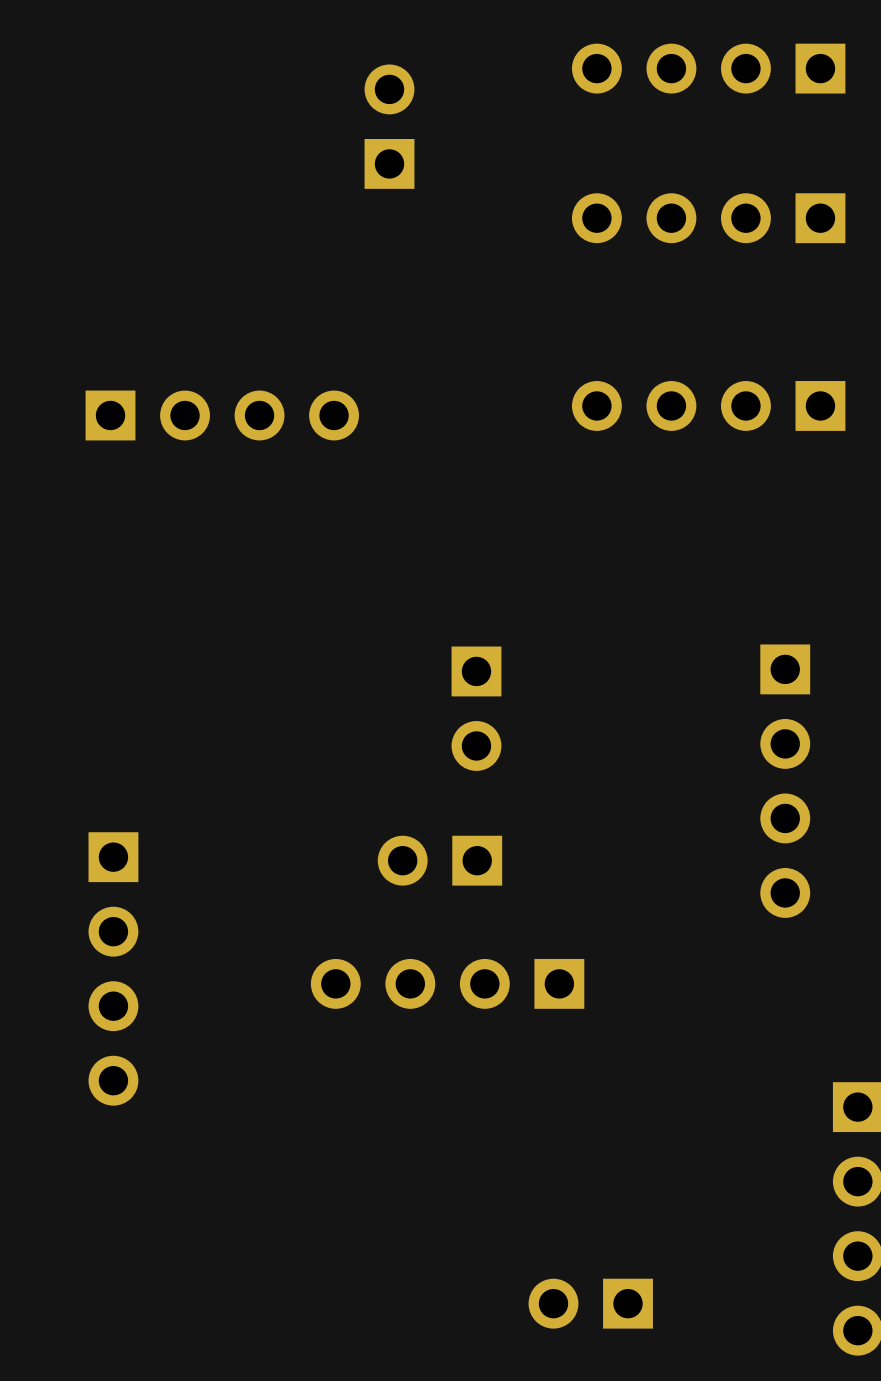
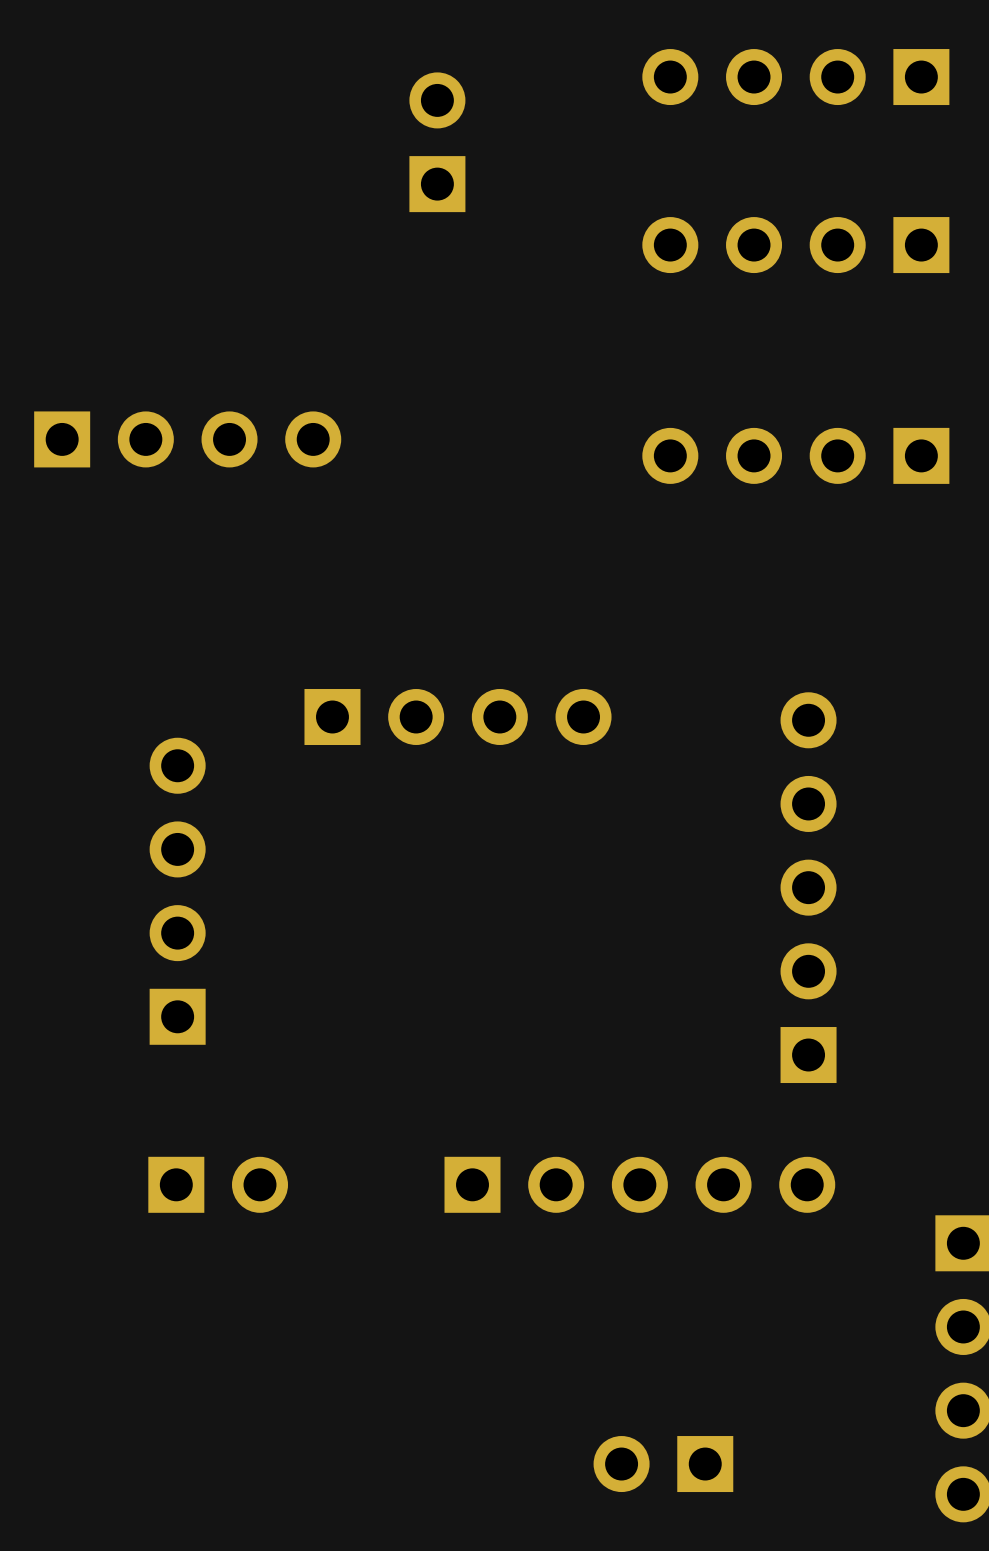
part position: (222, 415) -> (187, 439)
part: none -> (458, 716)
part: (476, 708) -> none
part: (785, 781) -> none
part: none -> (808, 887)
part: none -> (177, 891)
part: (439, 860) -> none
part: (113, 968) -> none
part: (447, 983) -> none
part: none -> (218, 1184)
part: none -> (639, 1184)

